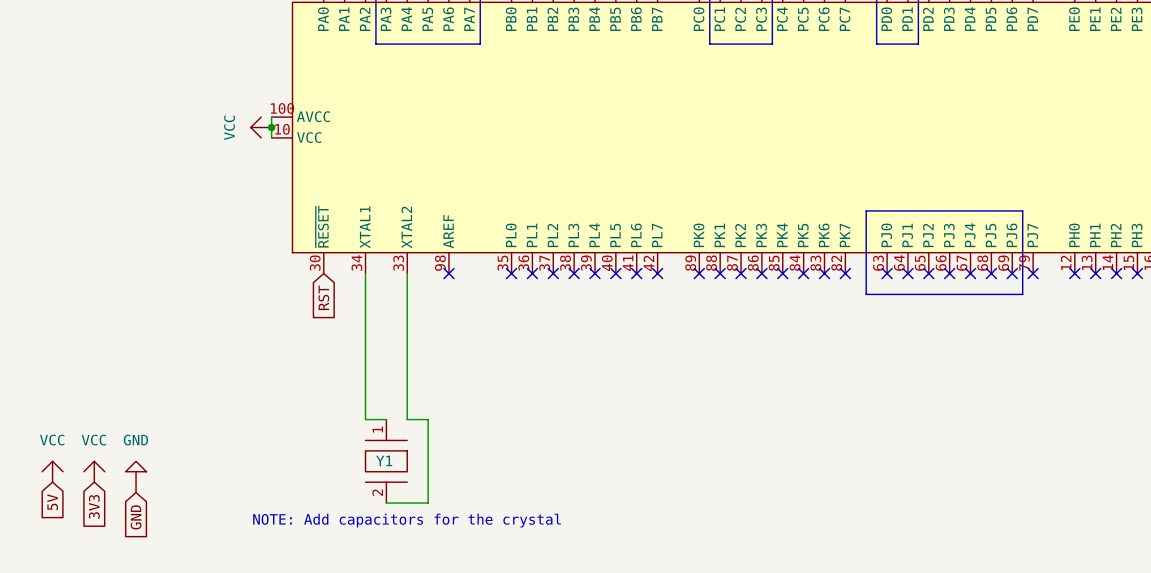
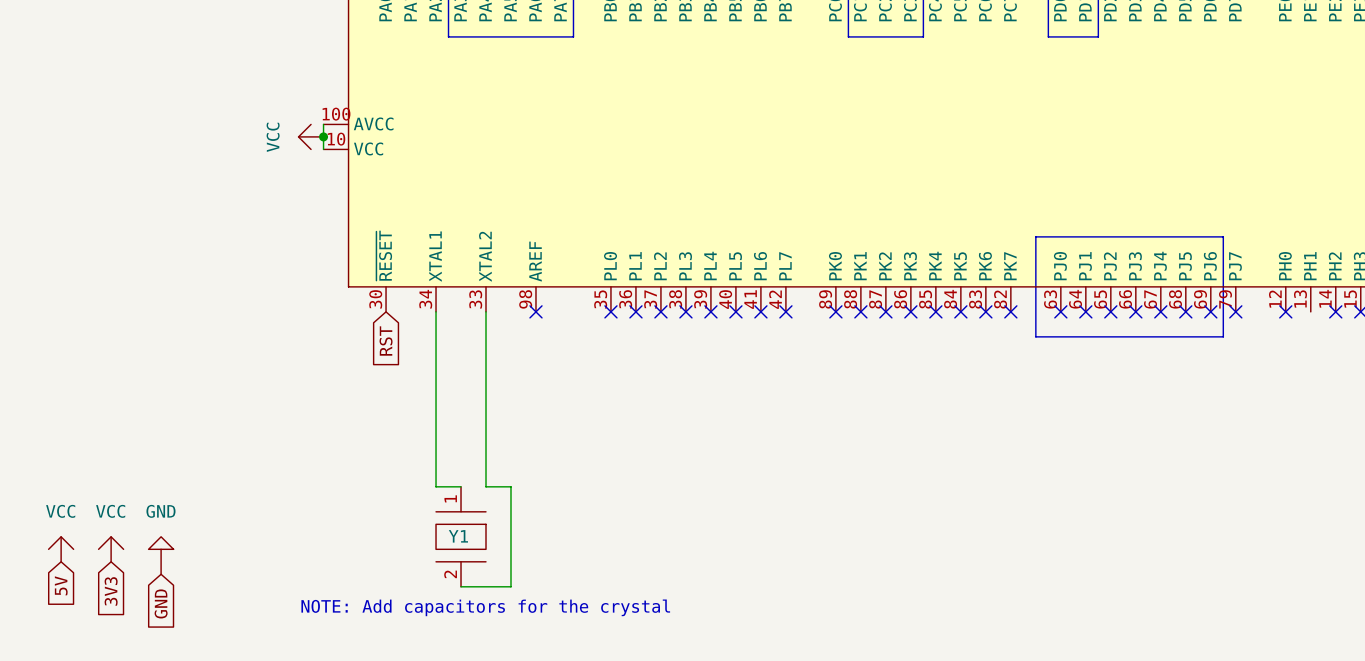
no-connect mark: (1095, 273) -> none

